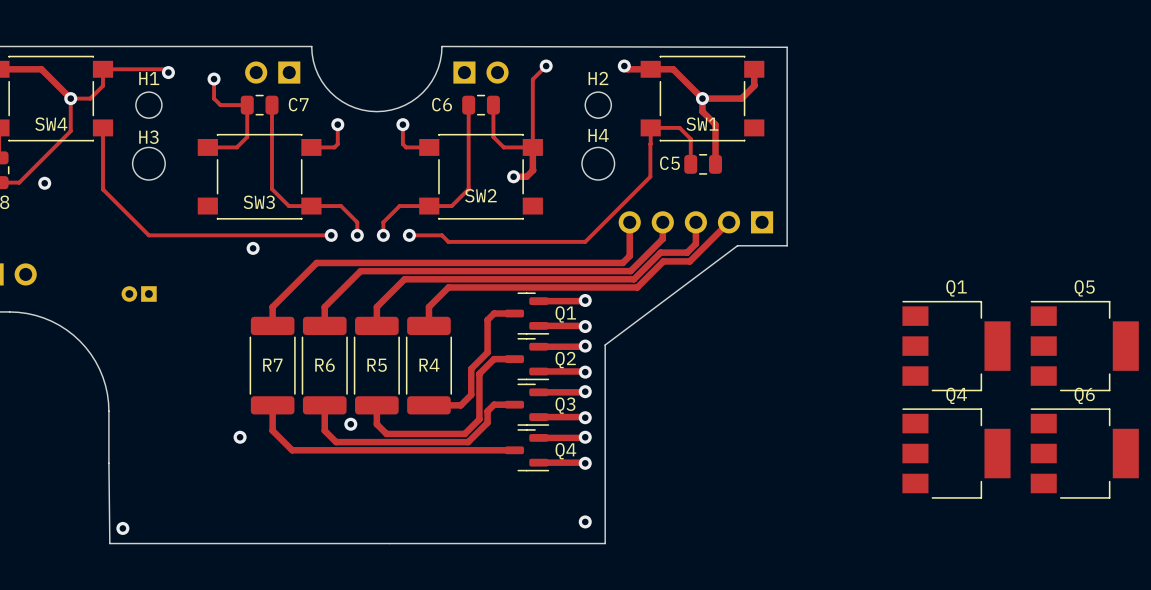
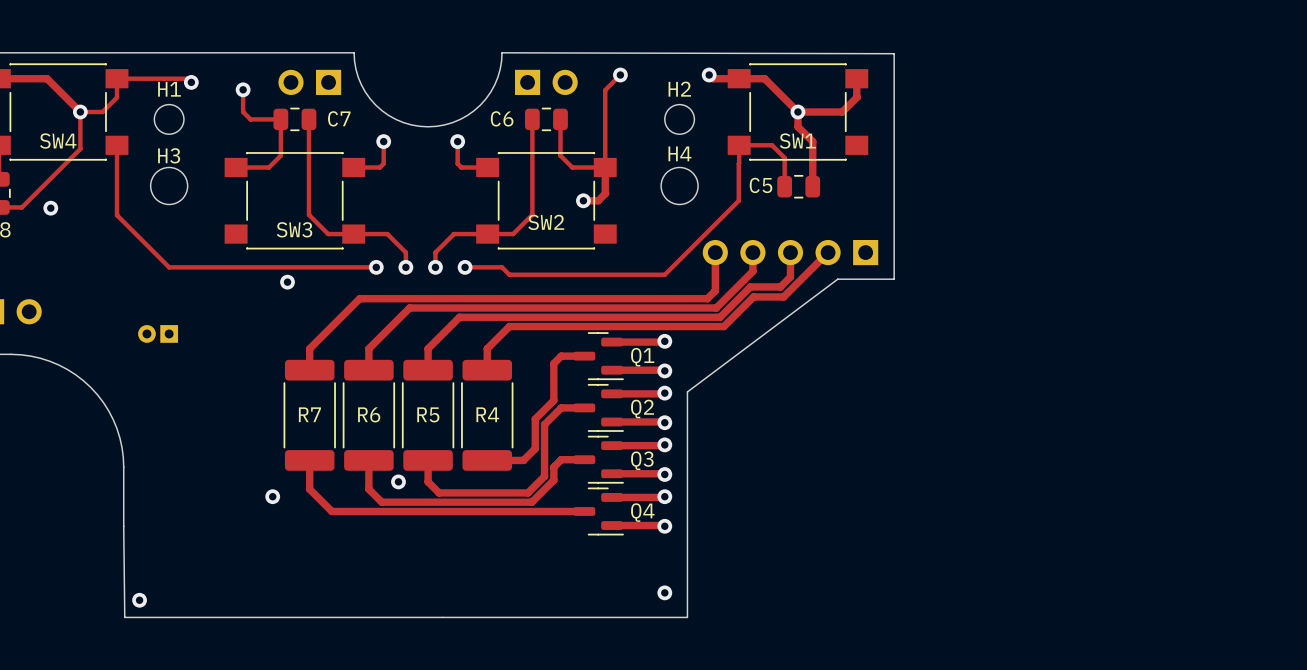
Q1: (956, 346) -> none
Q5: (1084, 346) -> none
Q4: (956, 453) -> none
Q6: (1084, 453) -> none

